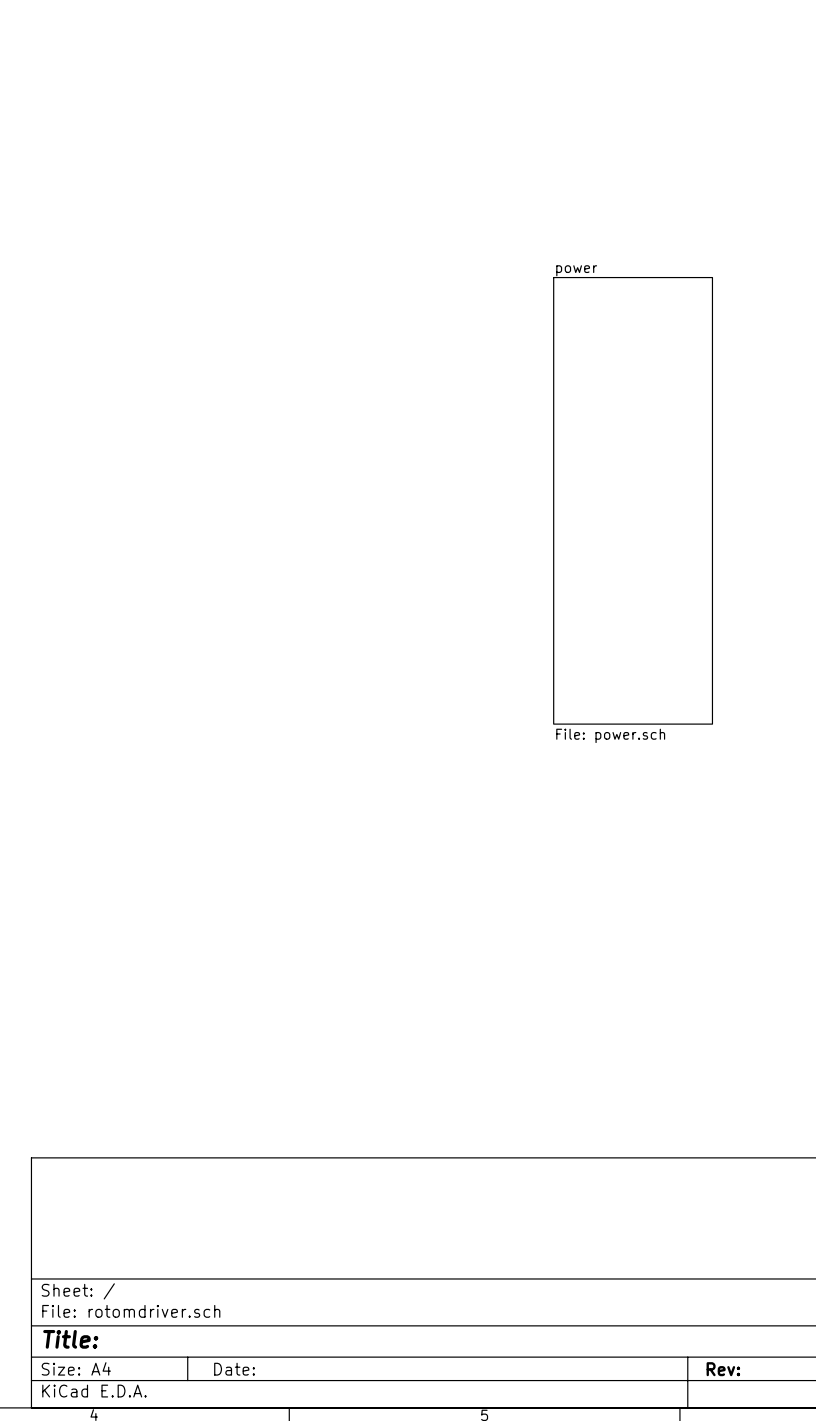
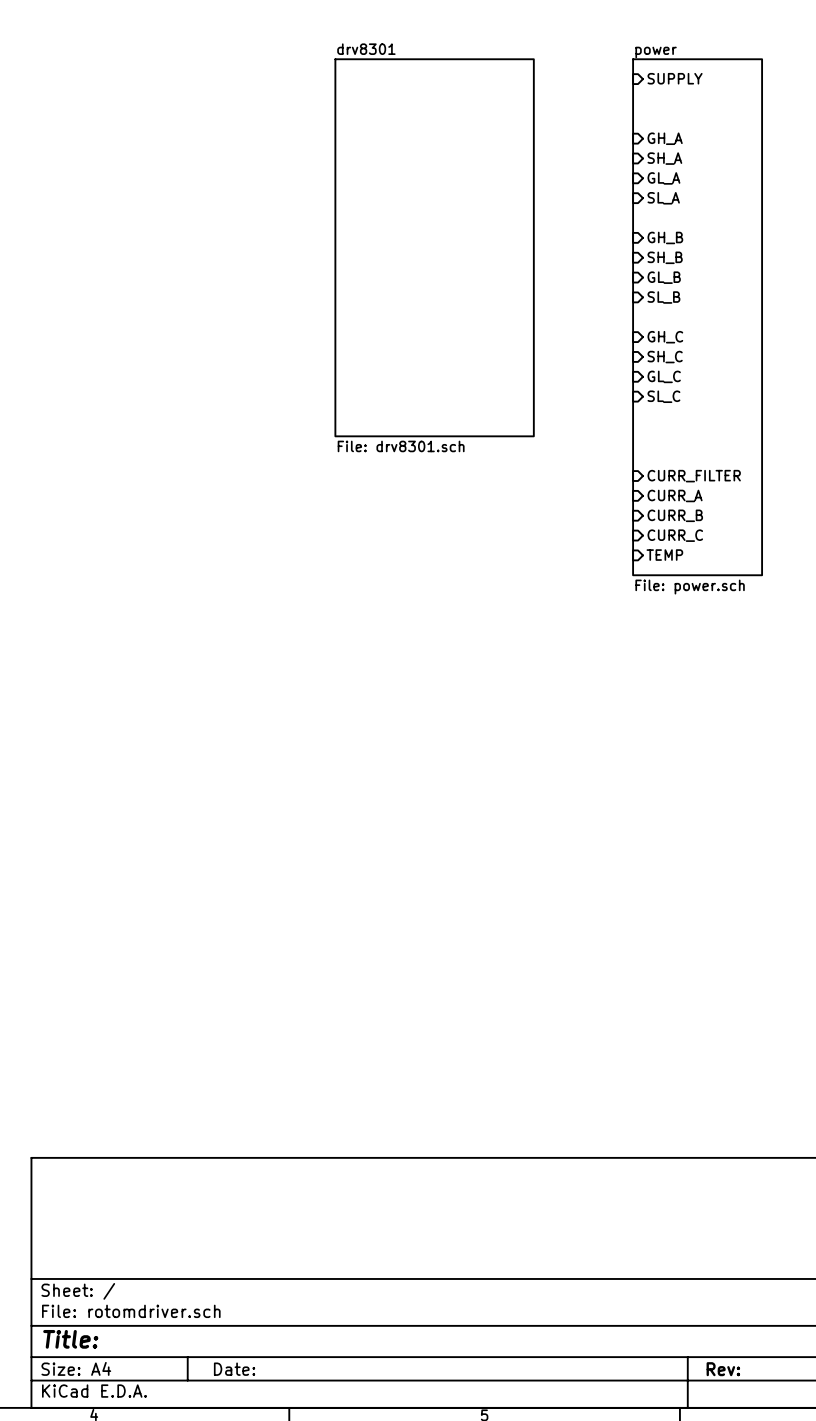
sheet pin: none -> SUPPLY (675, 78)
sheet pin: none -> GH_A (665, 138)
sheet pin: none -> SH_A (664, 158)
sheet pin: none -> GL_A (663, 178)
sheet pin: none -> SL_A (663, 198)
sheet pin: none -> GH_B (665, 237)
sheet drv8301: none -> File: drv8301.sch (434, 247)
sheet pin: none -> SH_B (665, 257)
sheet pin: none -> GL_B (664, 277)
sheet pin: none -> SL_B (663, 297)
sheet power: none -> File: power.sch (697, 317)
sheet pin: none -> GH_C (665, 337)
sheet pin: none -> SH_C (665, 357)
sheet pin: none -> GL_C (664, 376)
sheet pin: none -> SL_C (663, 396)
sheet pin: none -> CURR_FILTER (694, 476)
sheet pin: none -> CURR_A (675, 495)
sheet power: File: power.sch (633, 500) -> none
sheet pin: none -> CURR_B (675, 515)
sheet pin: none -> CURR_C (675, 535)
sheet pin: none -> TEMP (664, 555)

